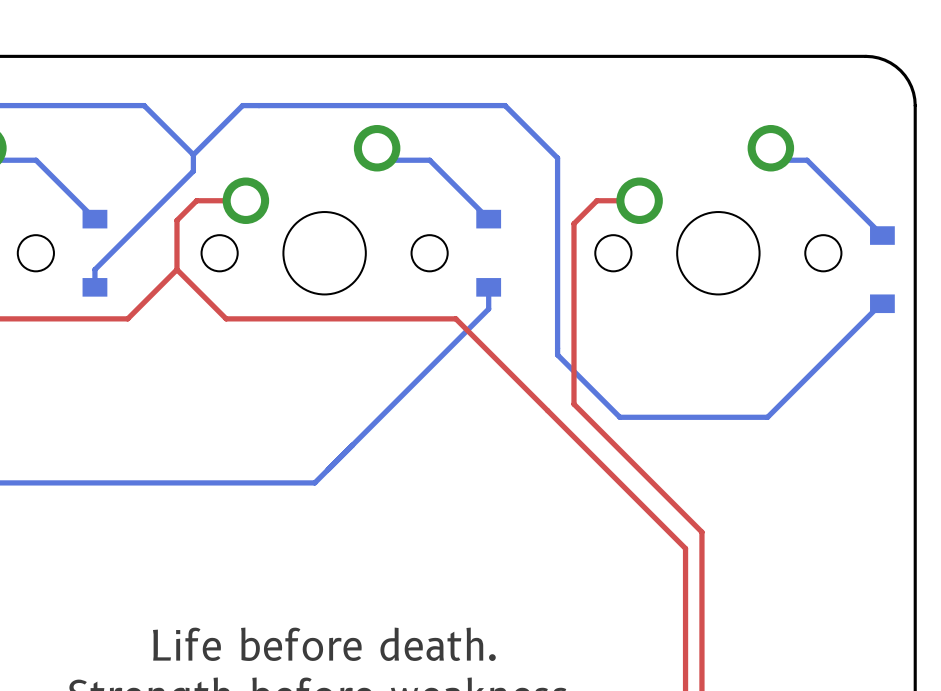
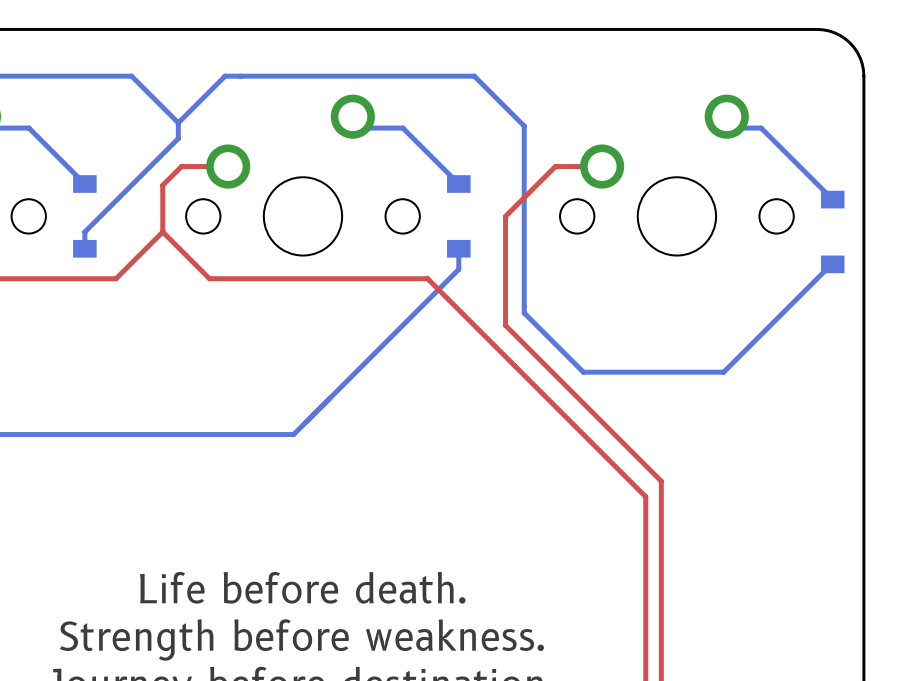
top track: (596, 200) (573, 223) (573, 404) -> (561, 166) (555, 166) (505, 216) (505, 325) (539, 359)

